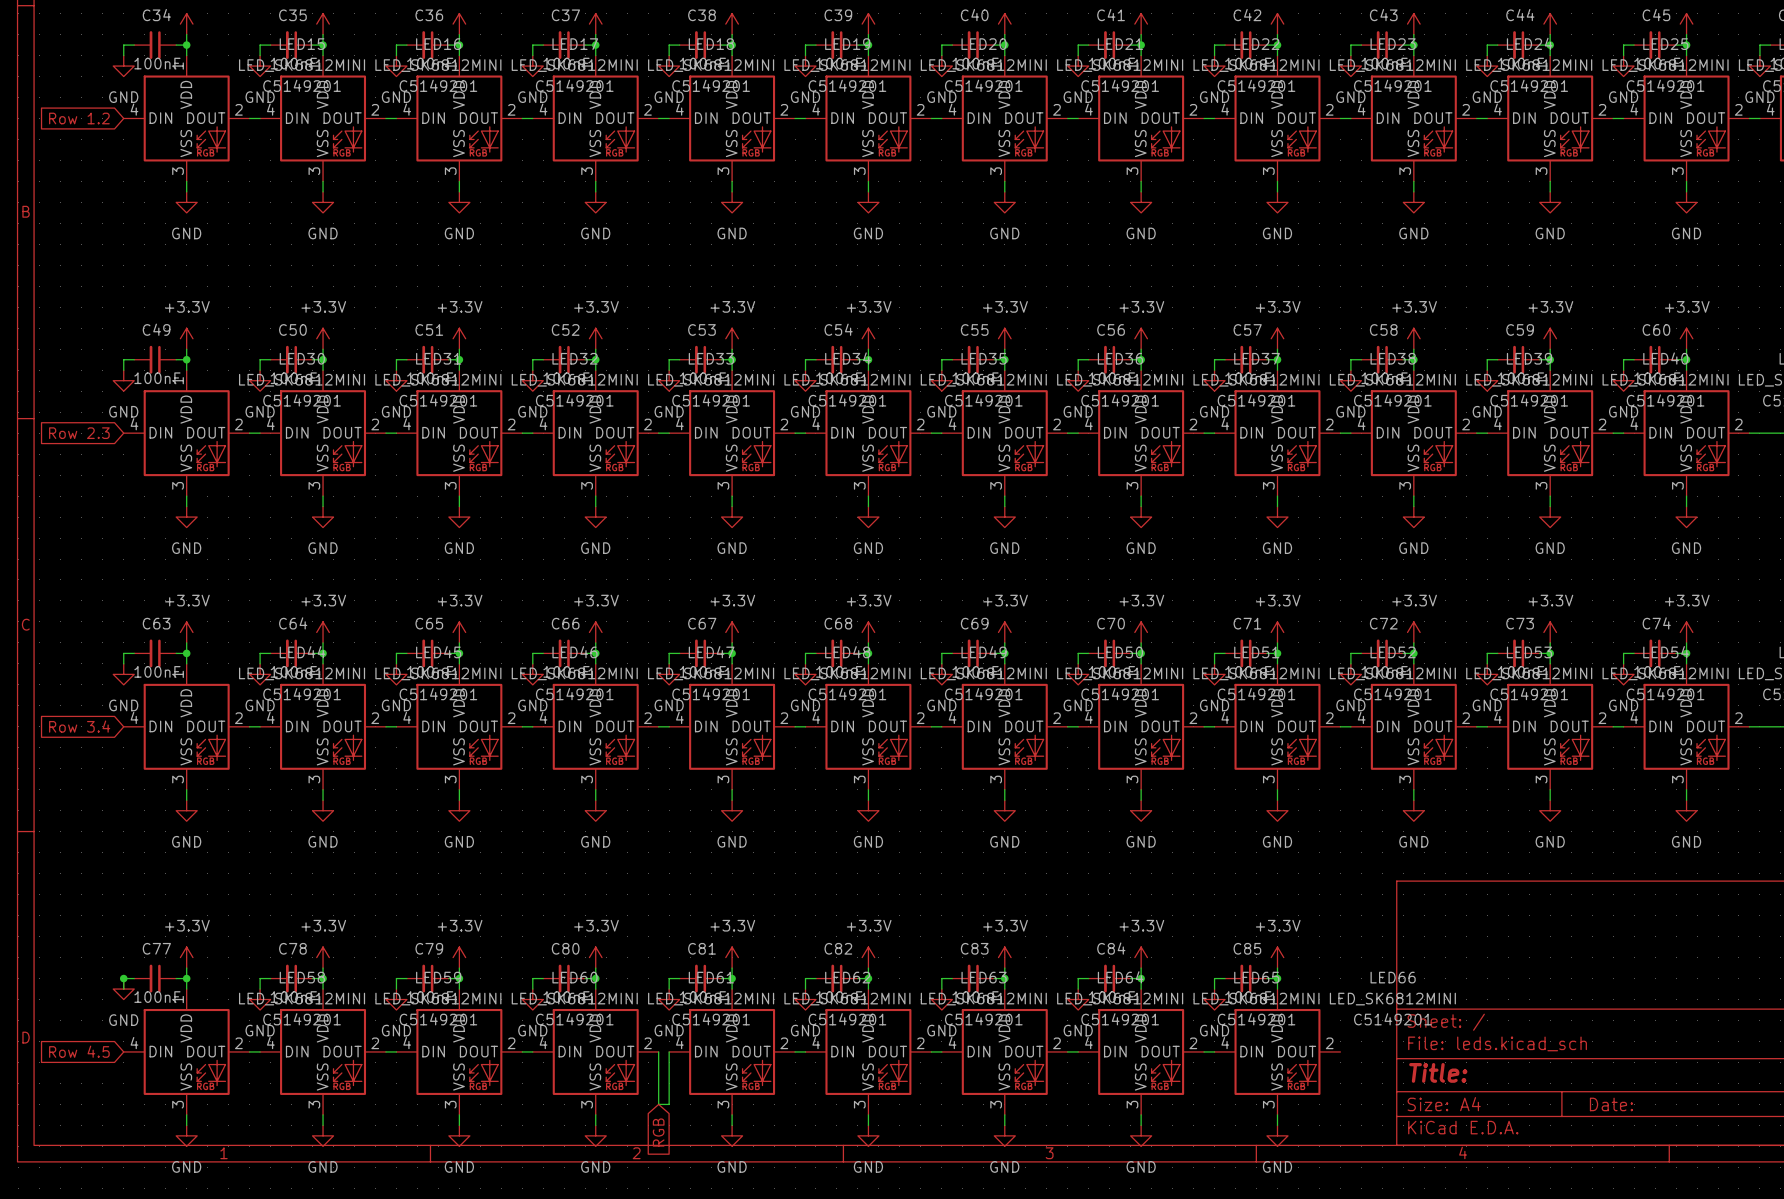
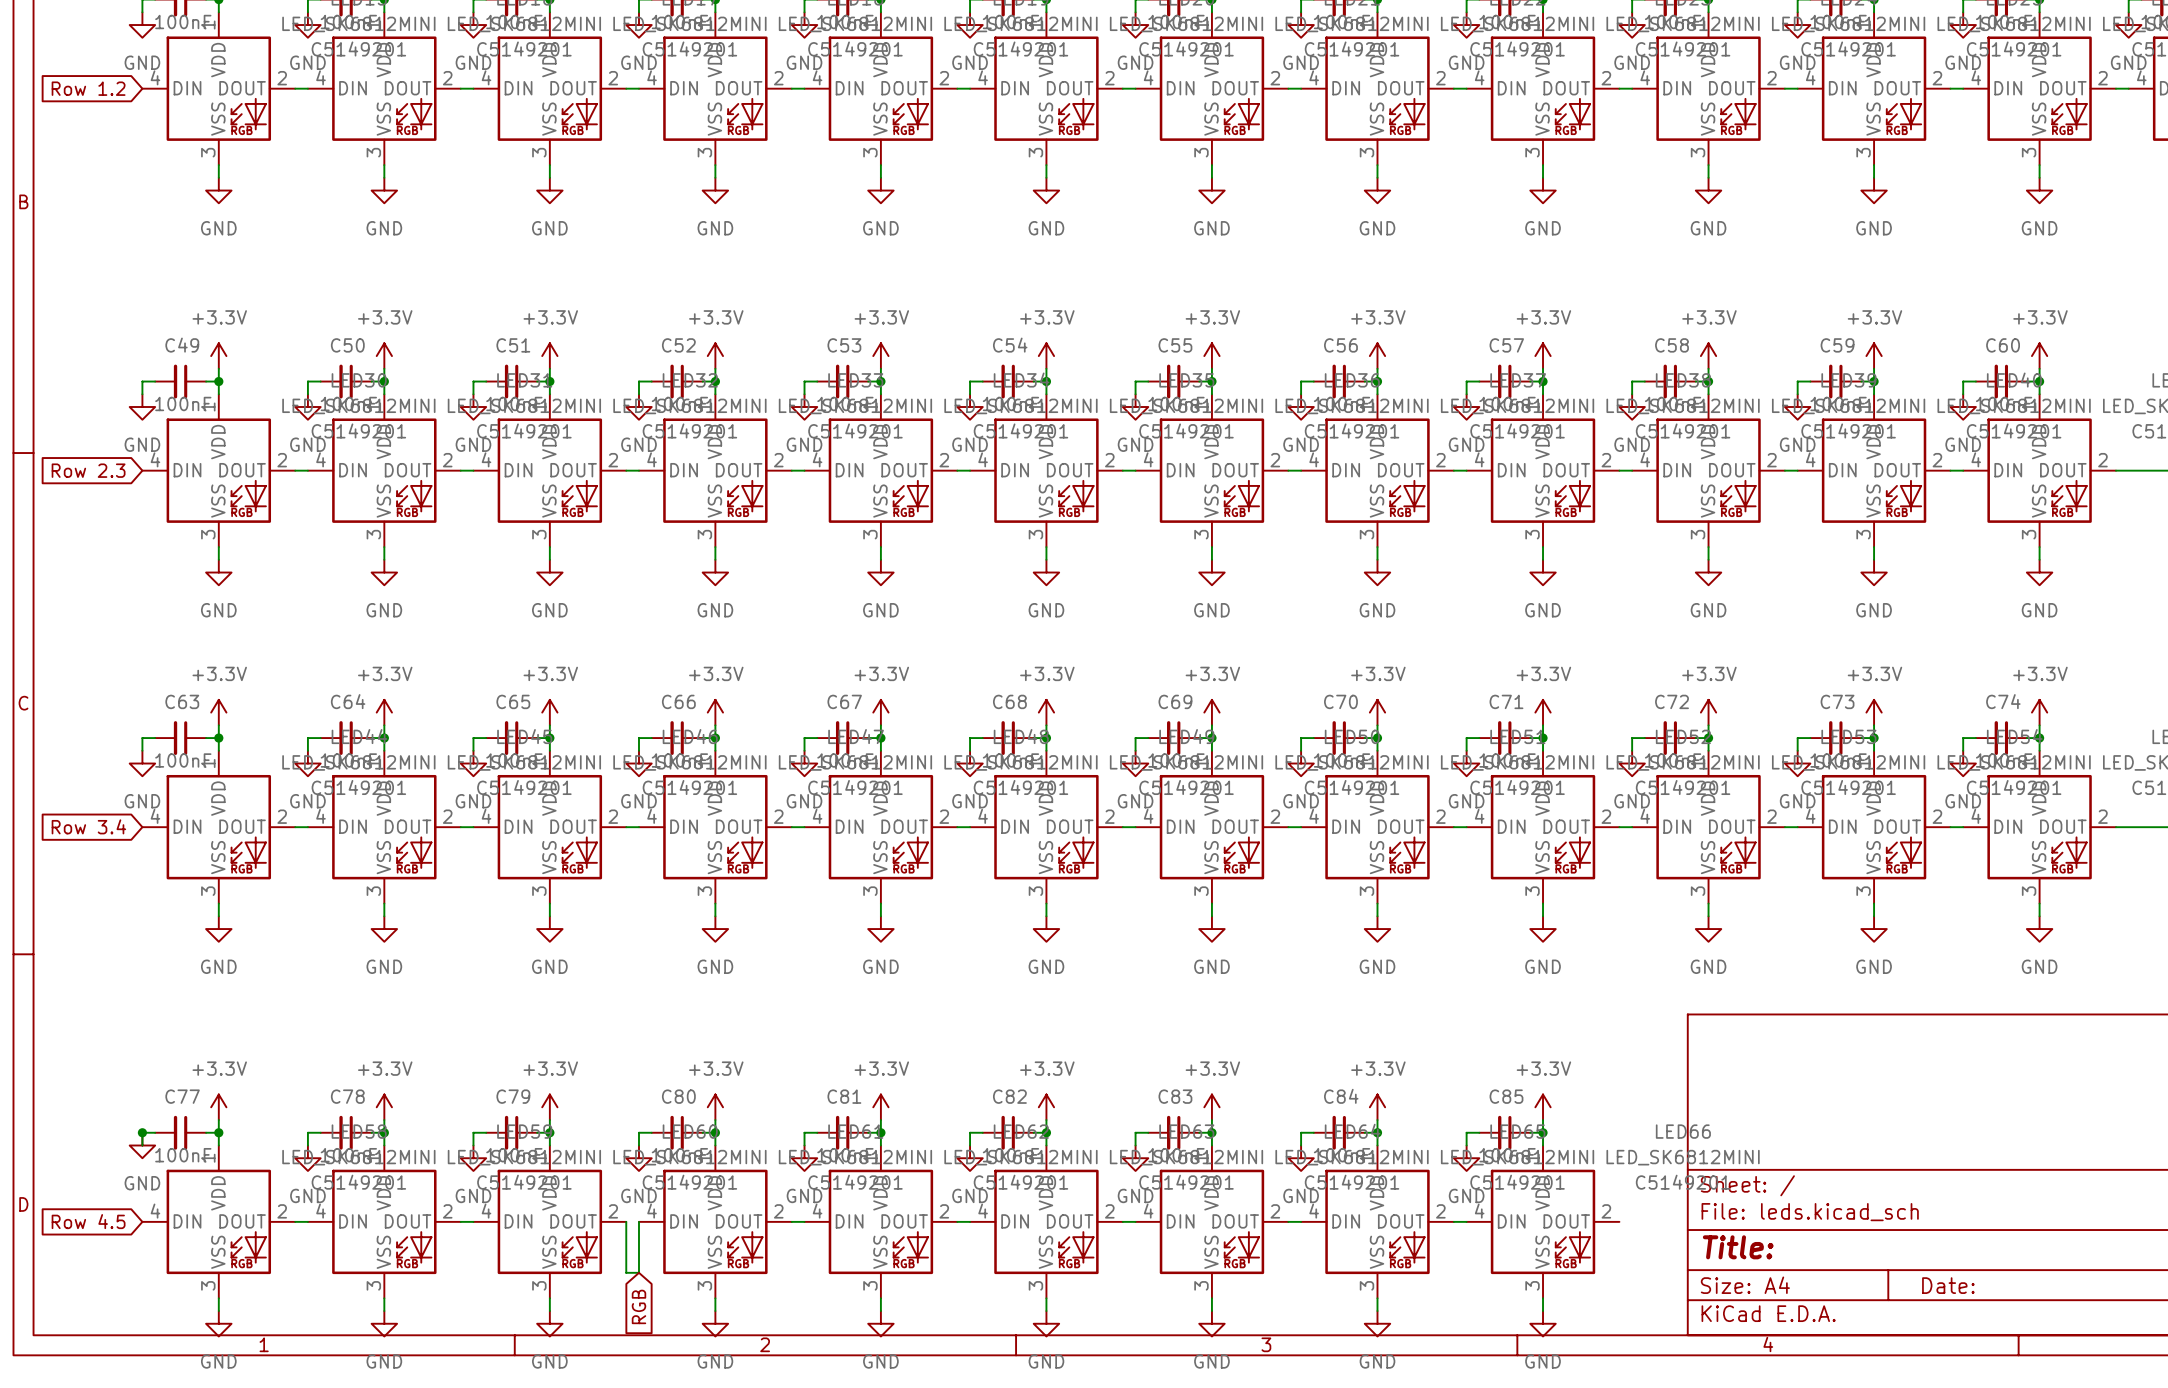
wire: (522, 1051) (532, 1051) -> (626, 1221) (626, 1272) (638, 1272) (638, 1221)
wire: (658, 1051) (658, 1104) (669, 1104) (669, 1051) -> (791, 1221) (804, 1221)
global label position: RGB (658, 1132) -> RGB (638, 1306)

